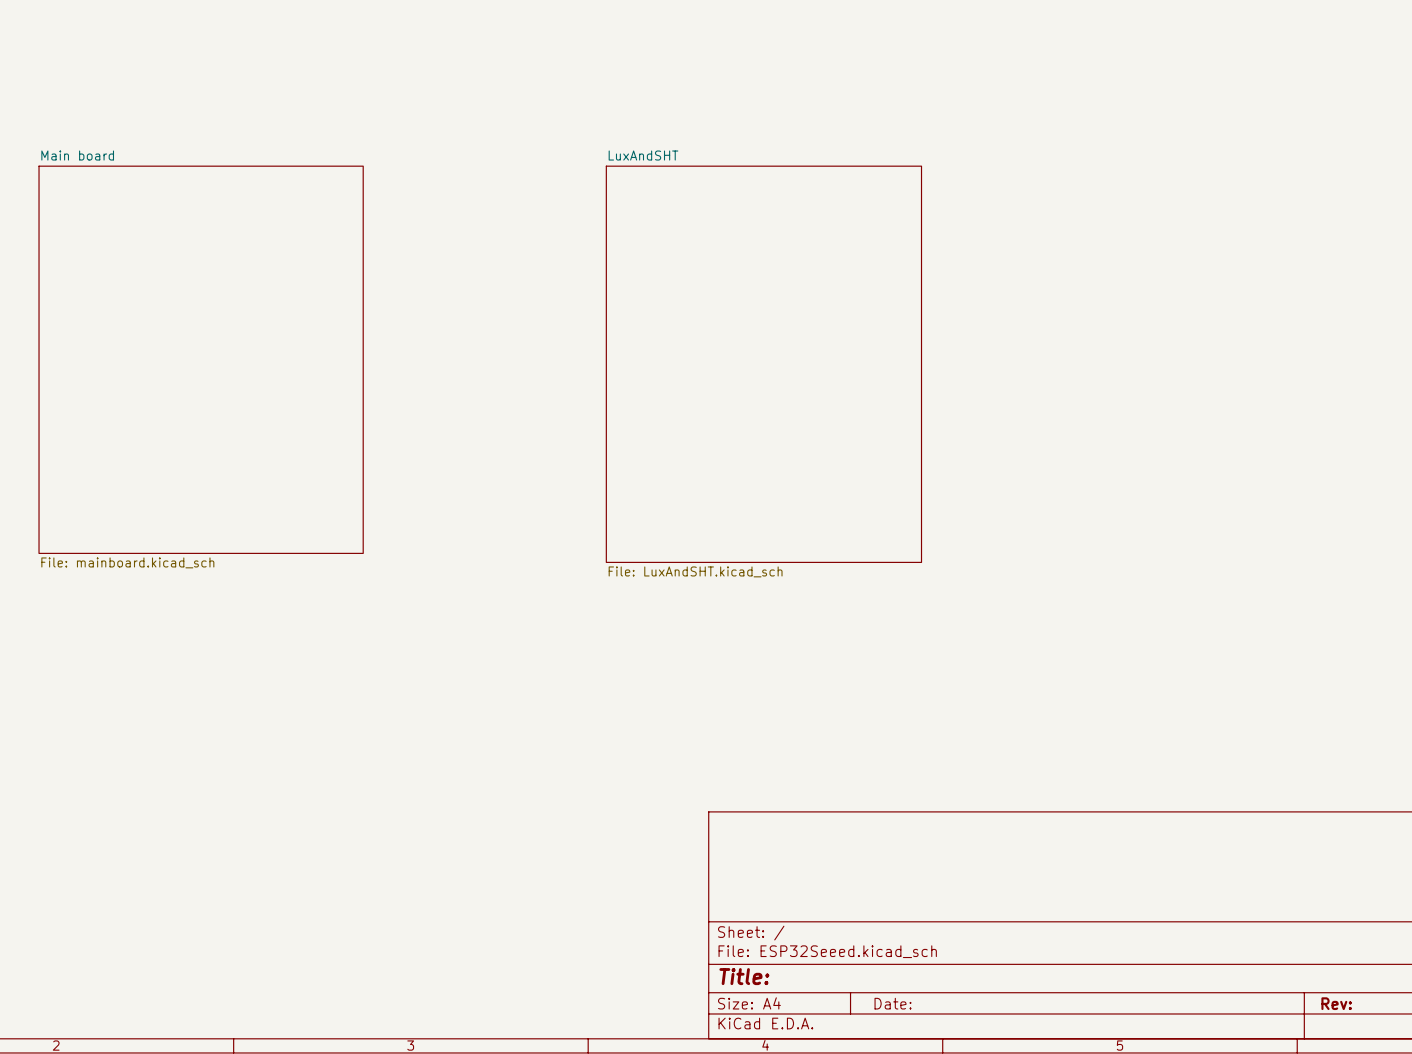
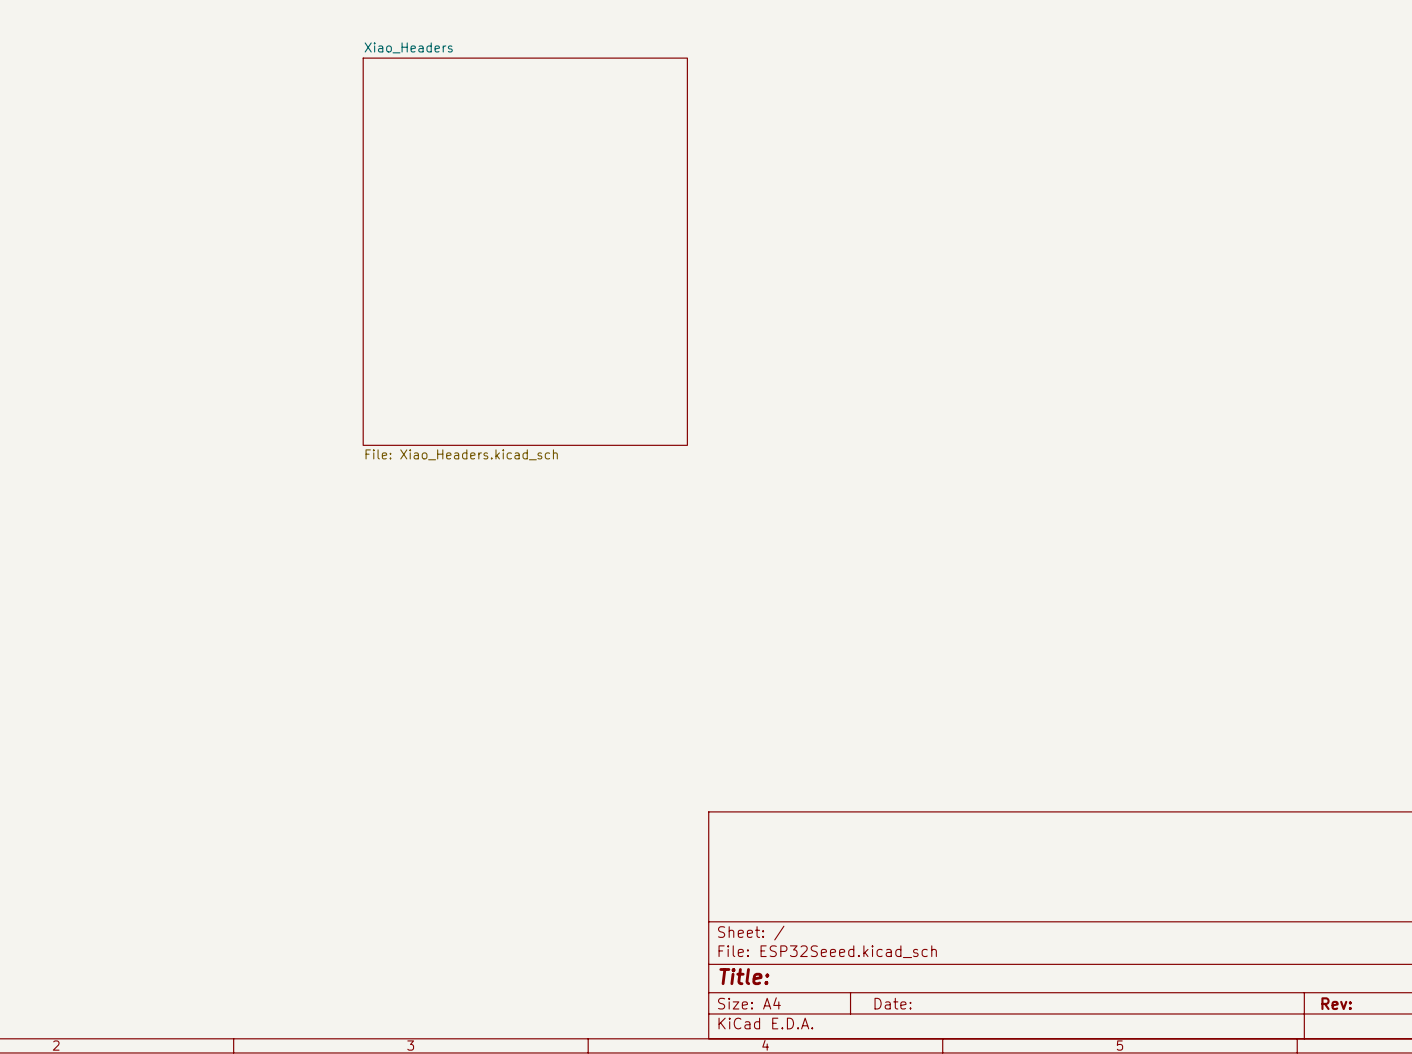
sheet Xiao_Headers: none -> File: Xiao_Headers.kicad_sch (525, 251)
sheet Main board: File: mainboard.kicad_sch (201, 359) -> none
sheet LuxAndSHT: File: LuxAndSHT.kicad_sch (763, 364) -> none

